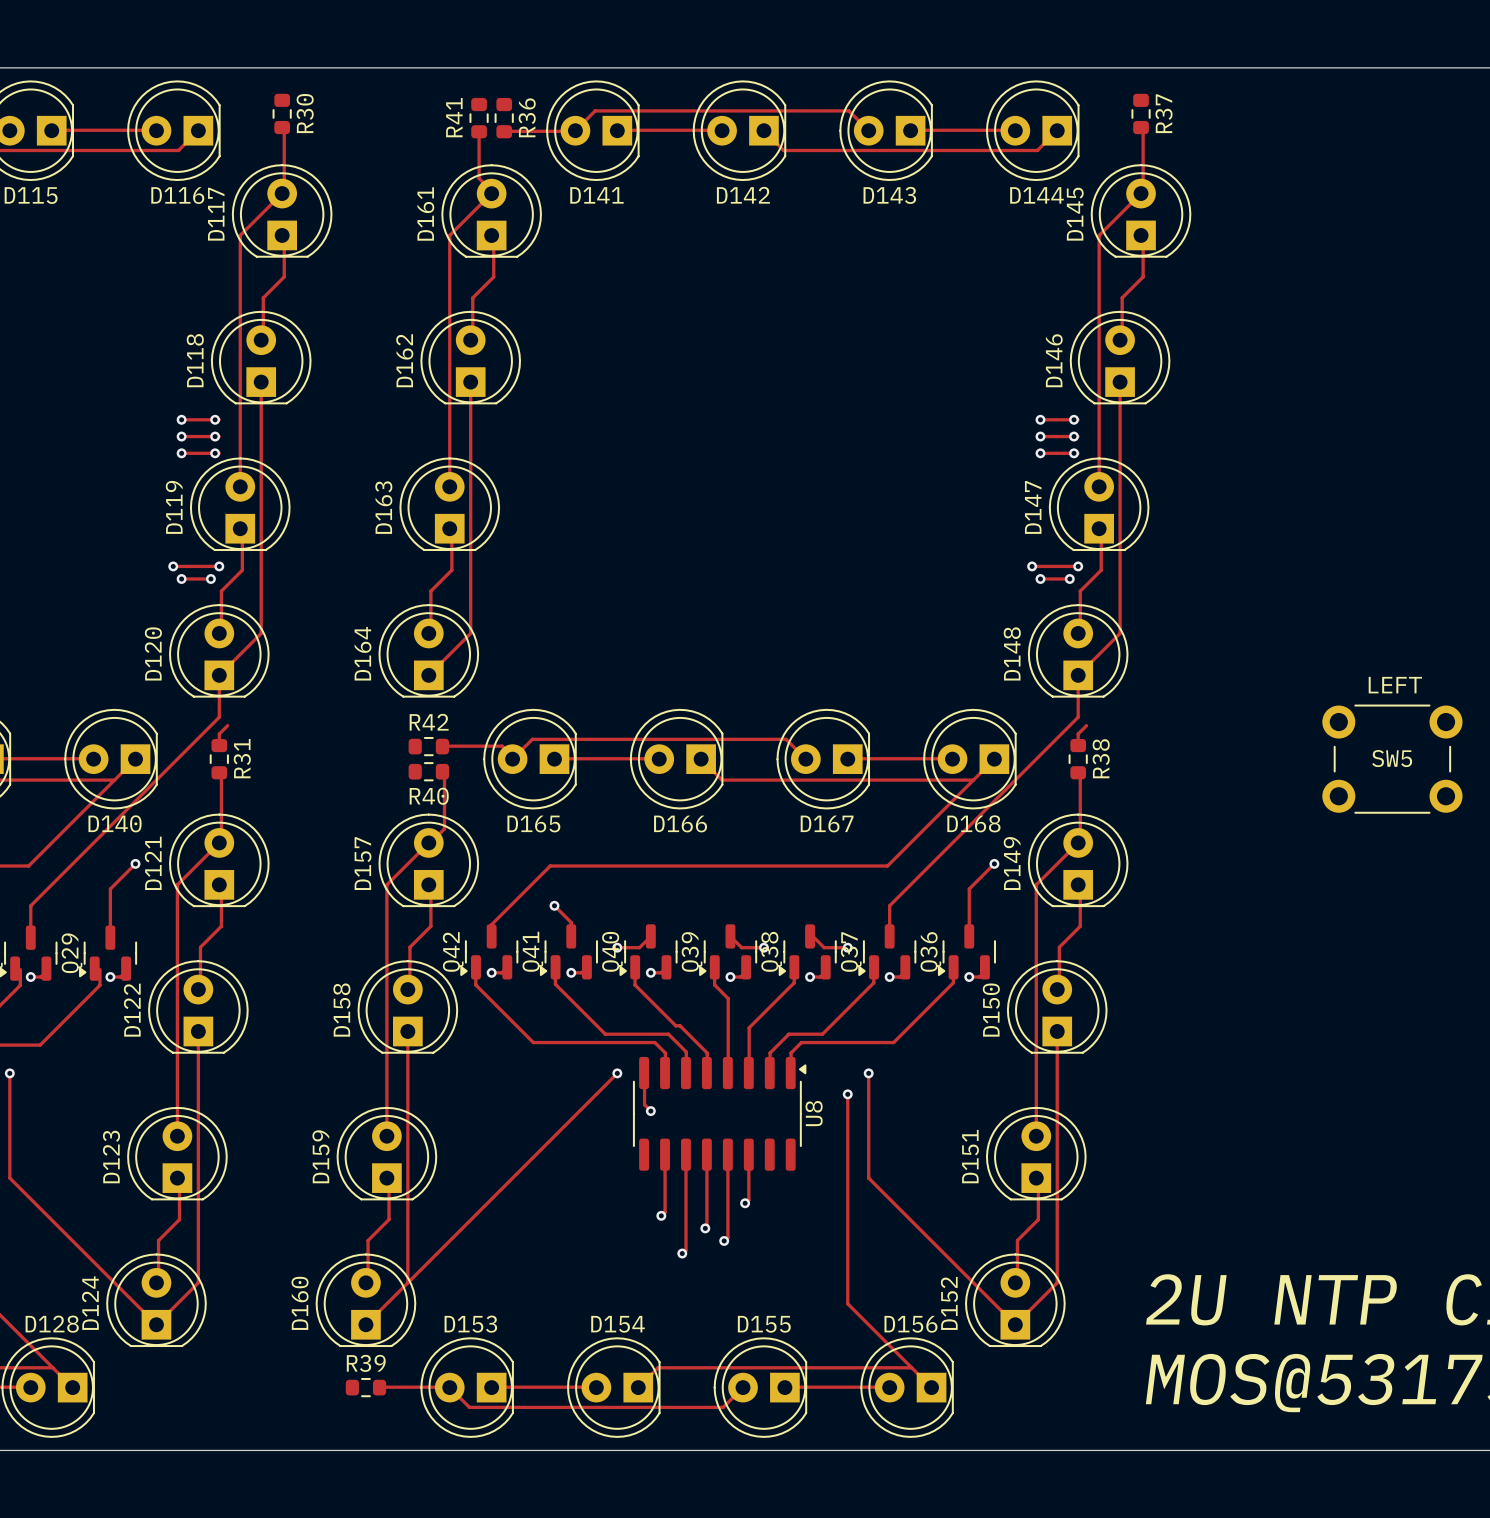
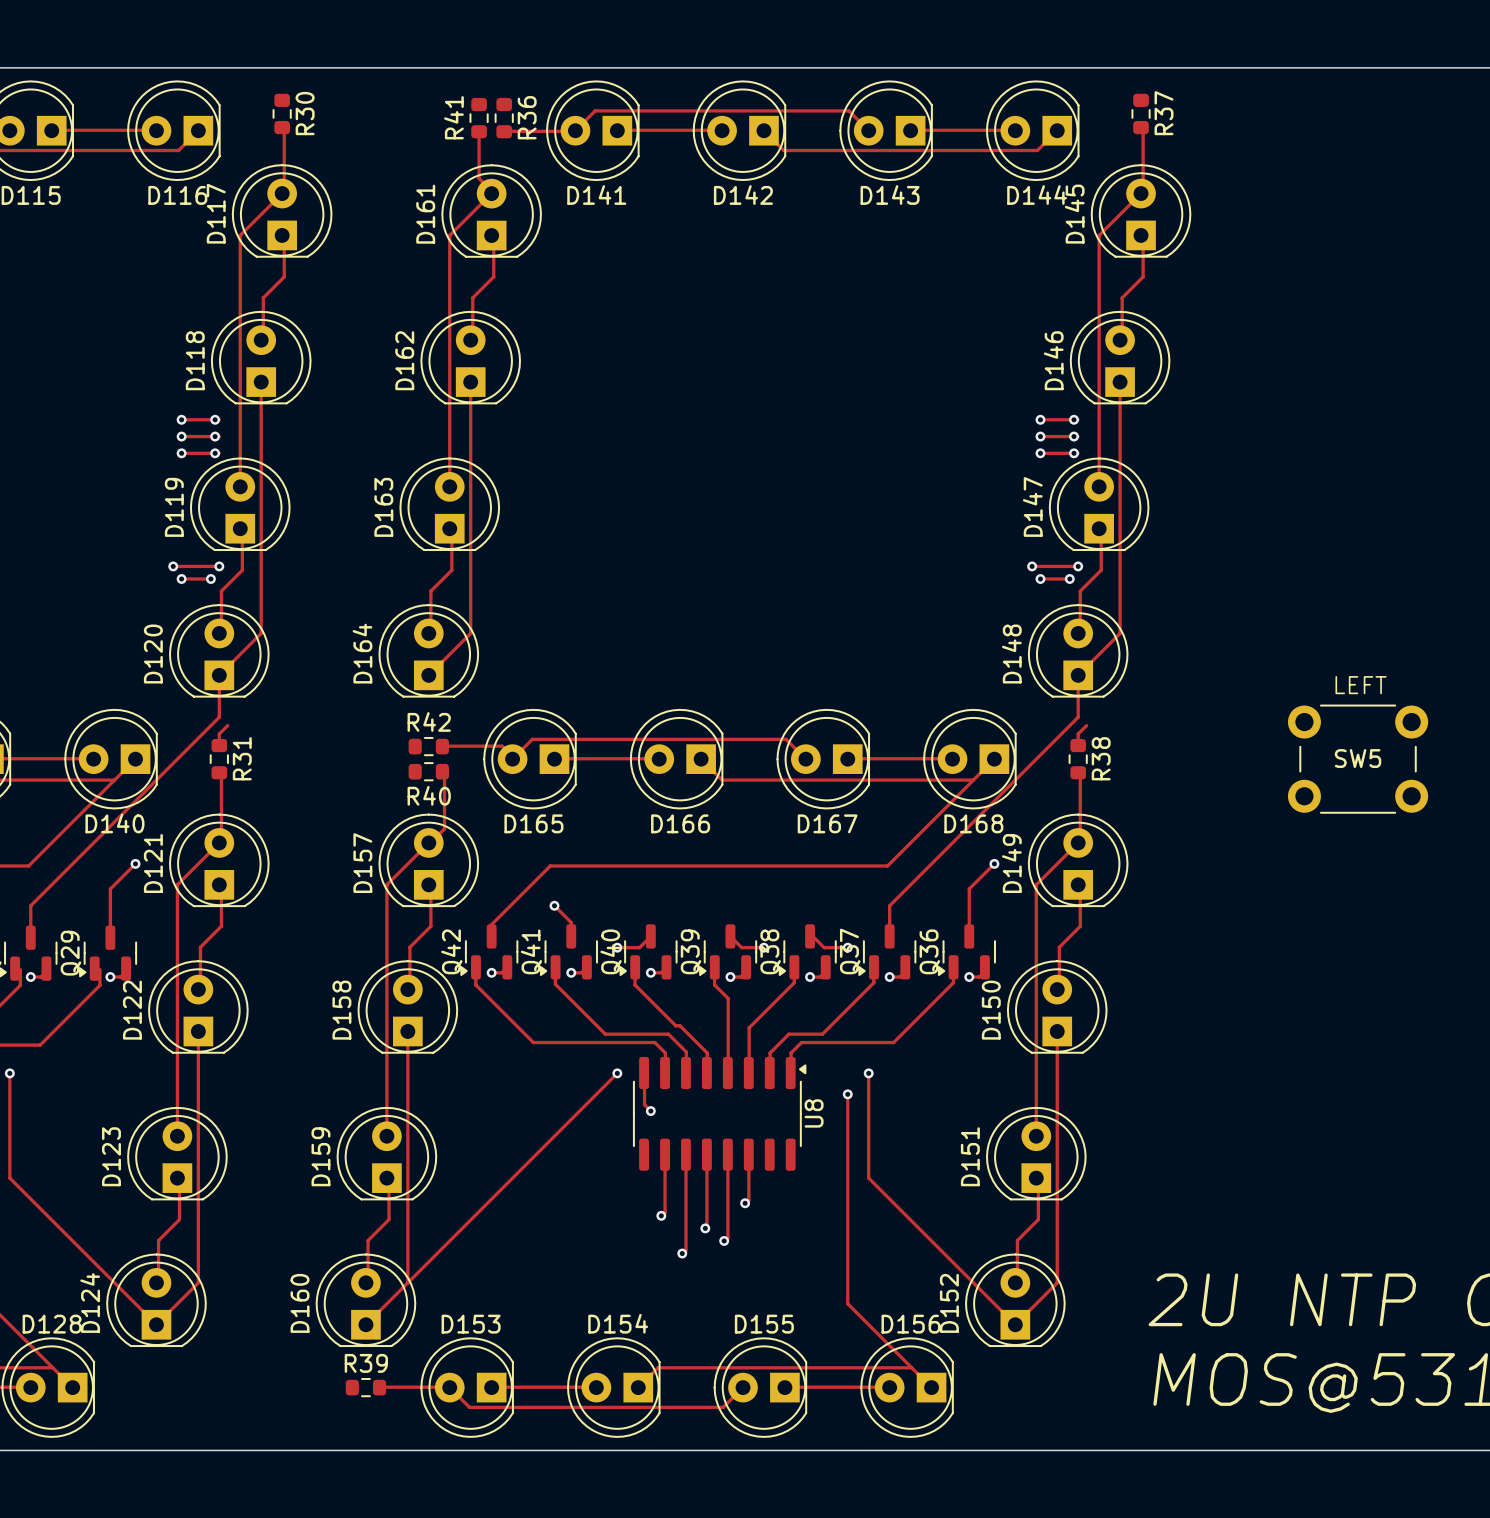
text position: LEFT (1395, 685) -> LEFT (1361, 685)
SW5 position: (1392, 759) -> (1358, 759)

